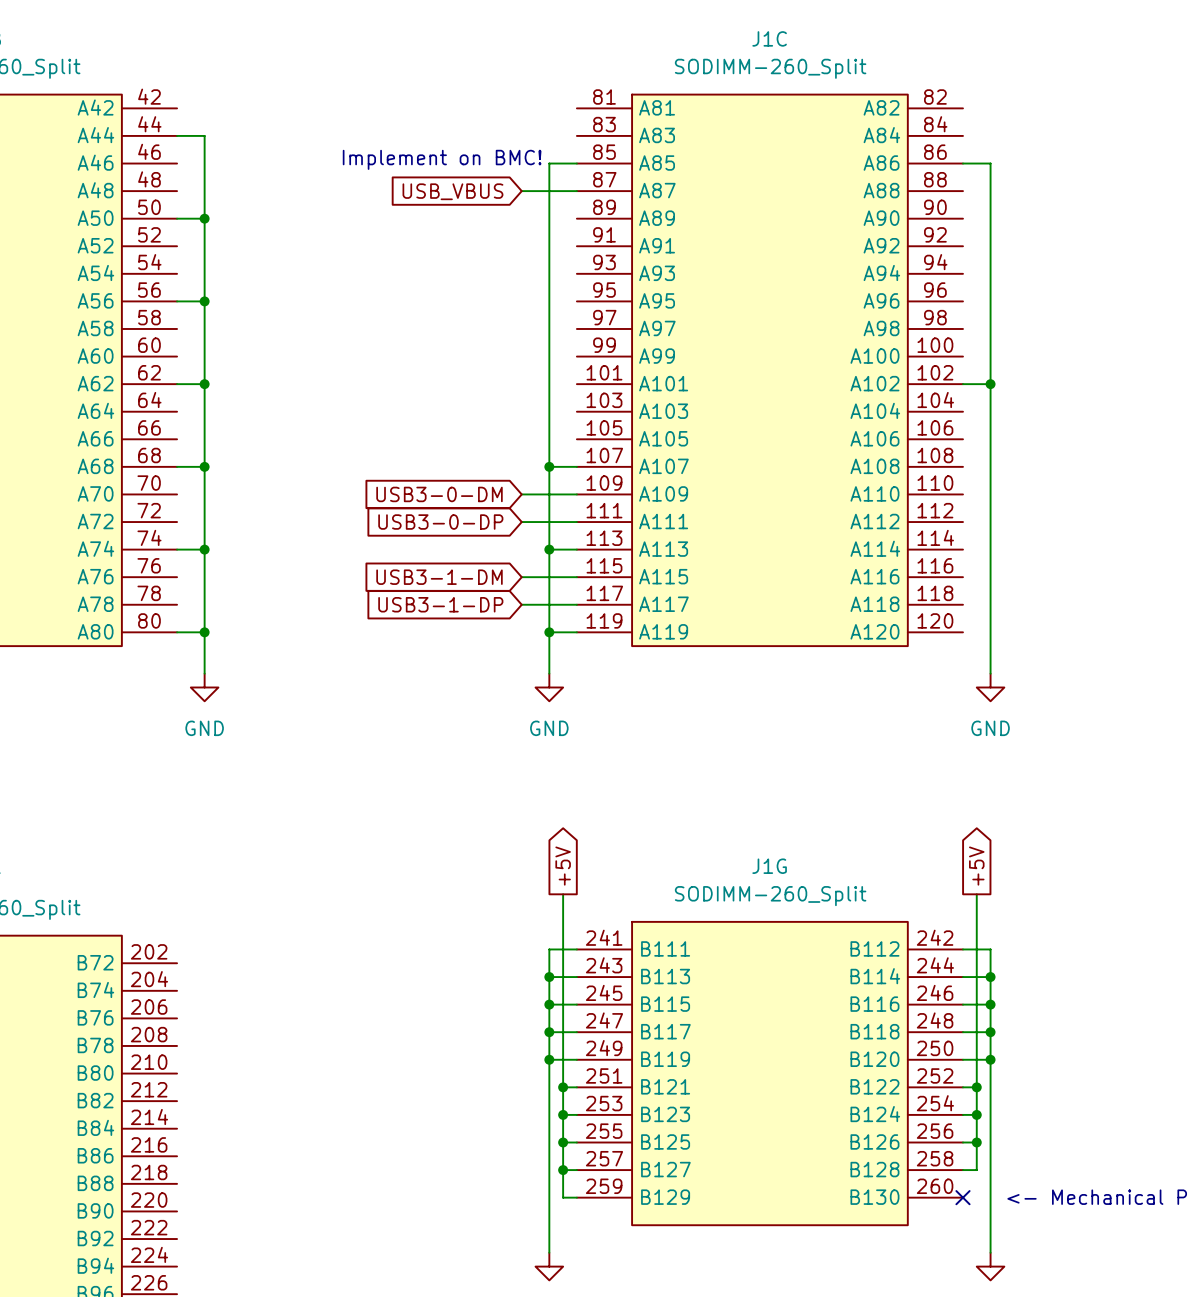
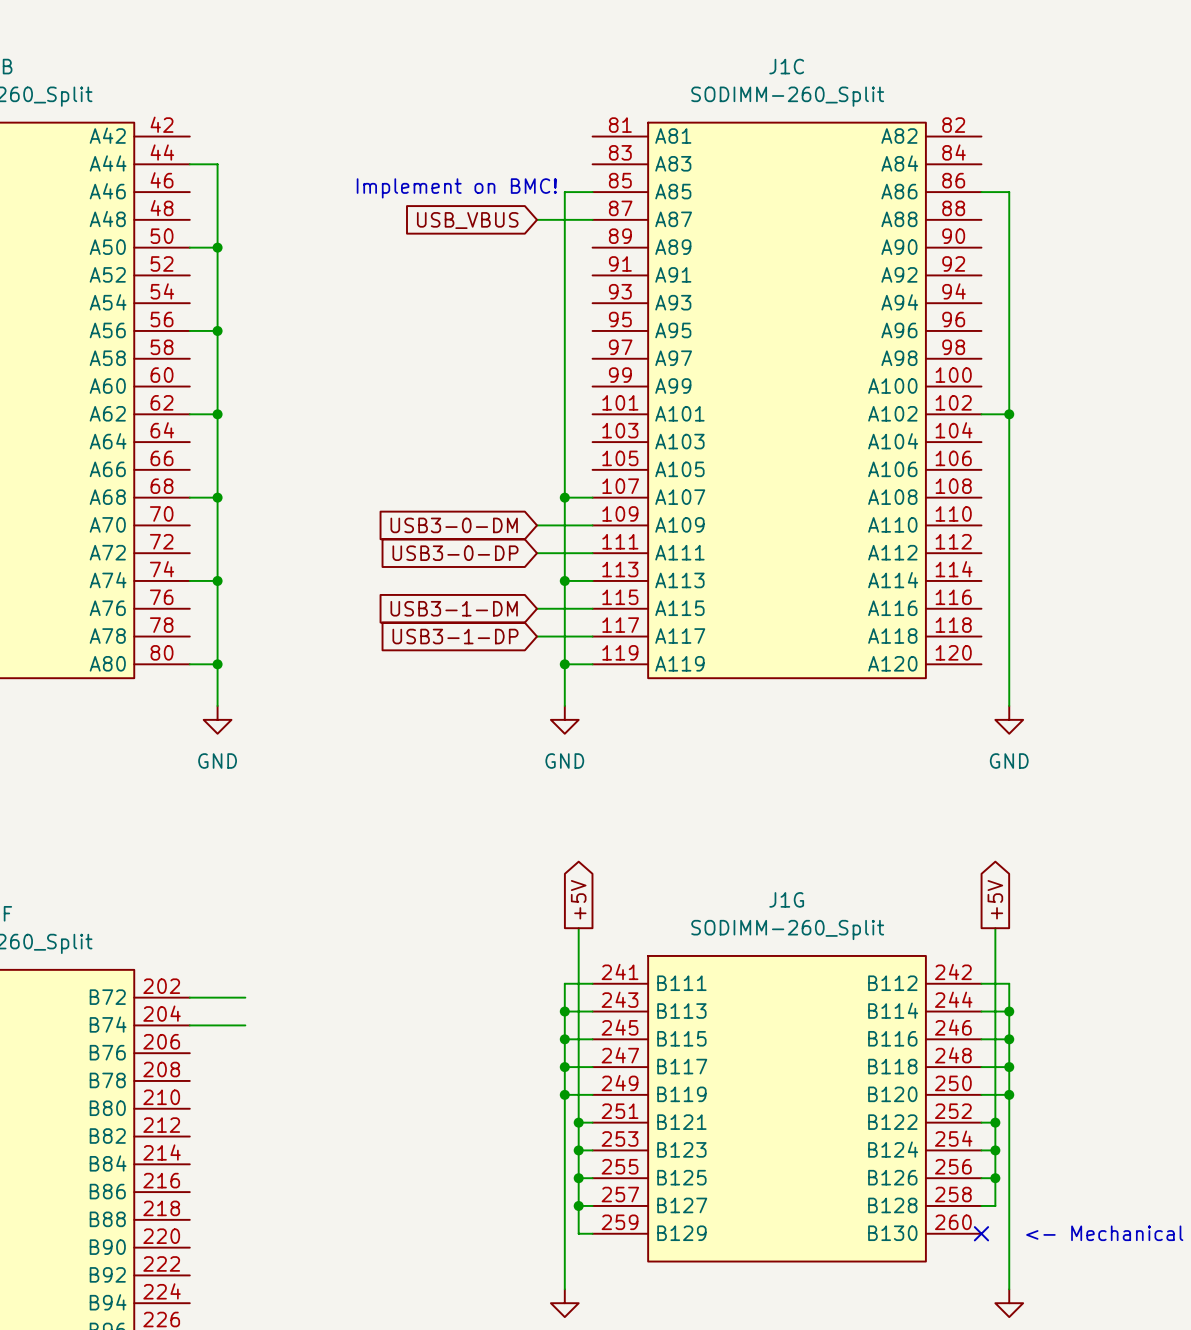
wire: none -> (189, 997) (245, 997)
wire: none -> (189, 1025) (245, 1025)

